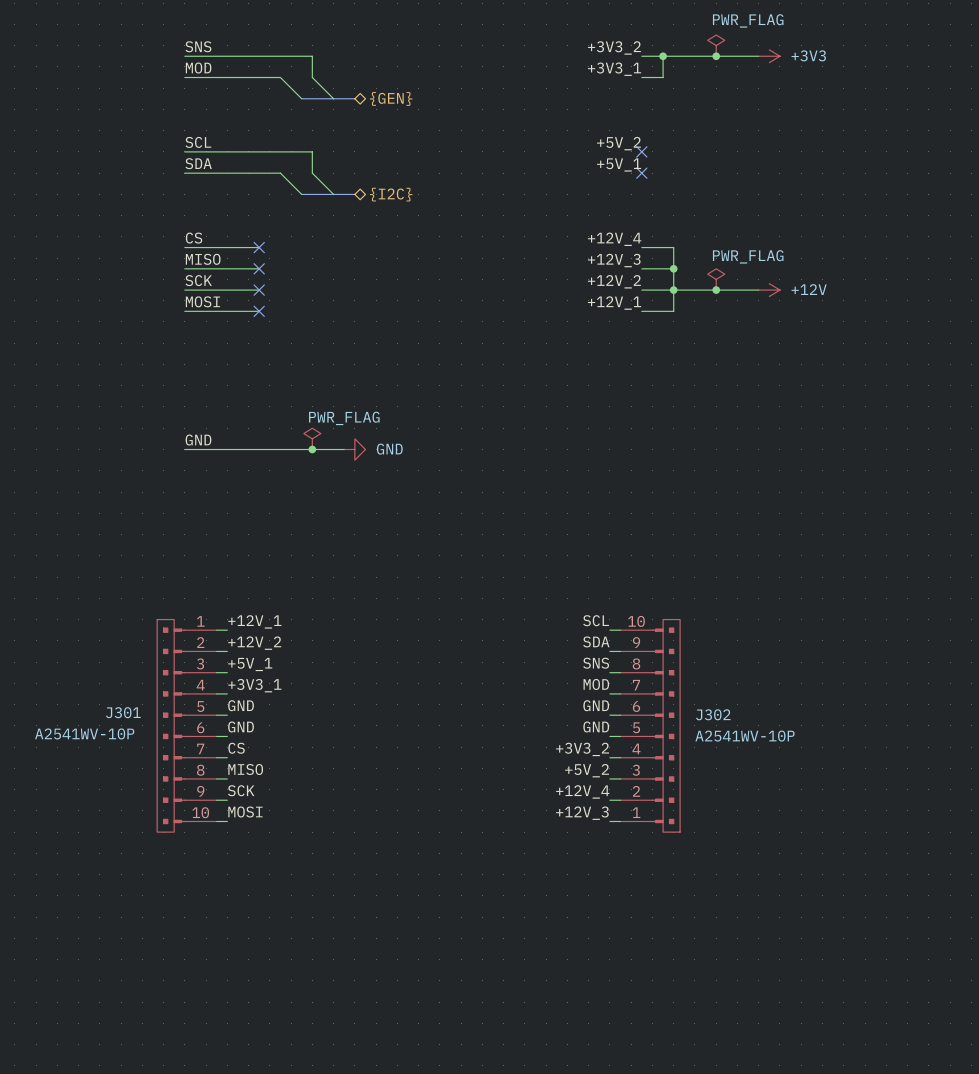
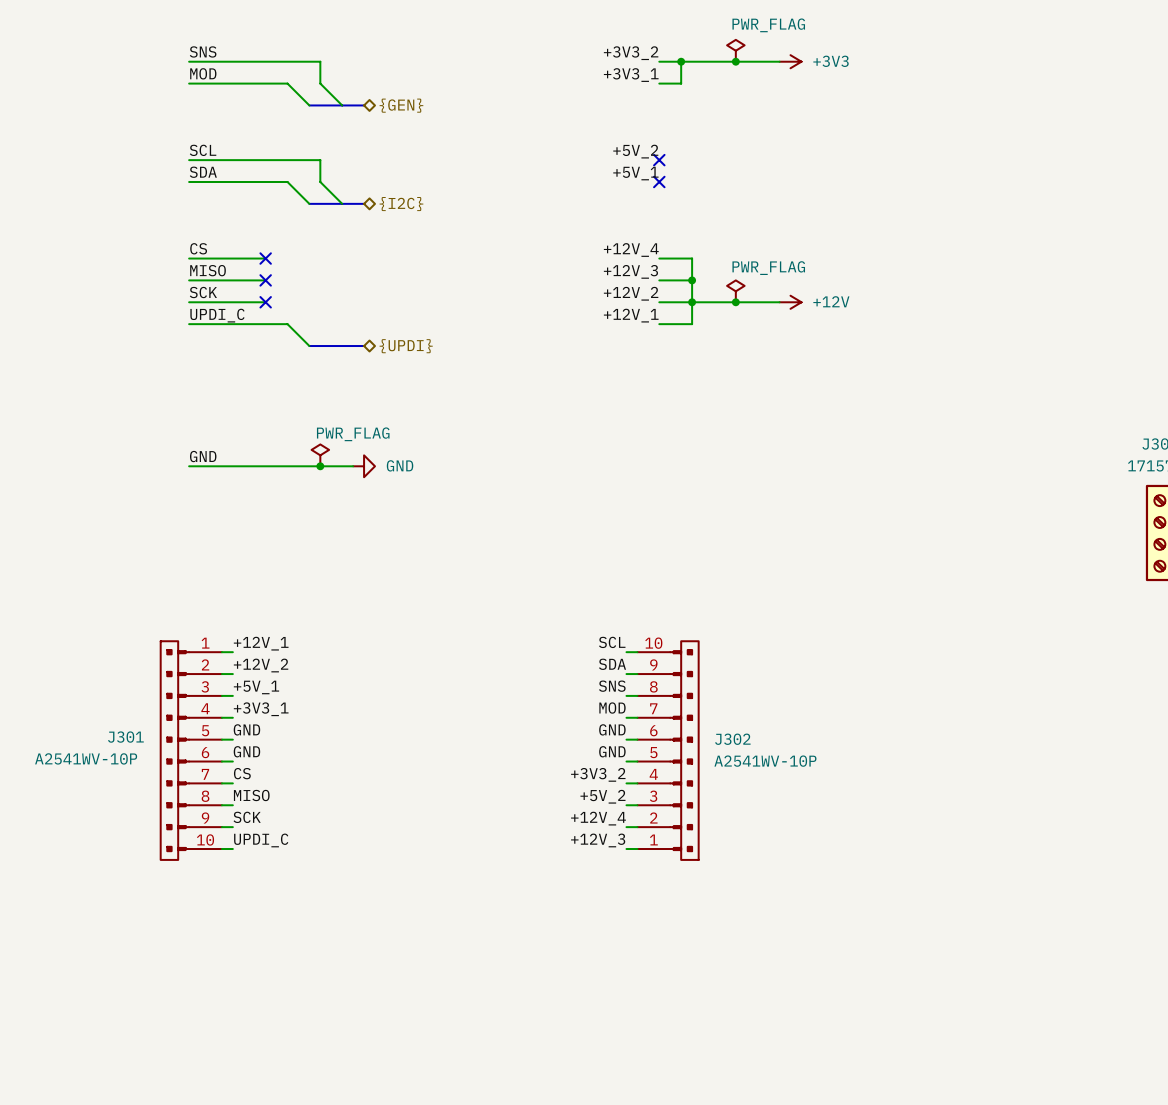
label: MOSI (202, 301) -> UPDI_C (217, 315)
wire: none -> (265, 324) (287, 324) (309, 346)
no-connect mark: (259, 311) -> none
bus: none -> (309, 346) (364, 346)
hierarchical label: none -> {UPDI} (406, 346)
label: MOSI (245, 812) -> UPDI_C (261, 840)

